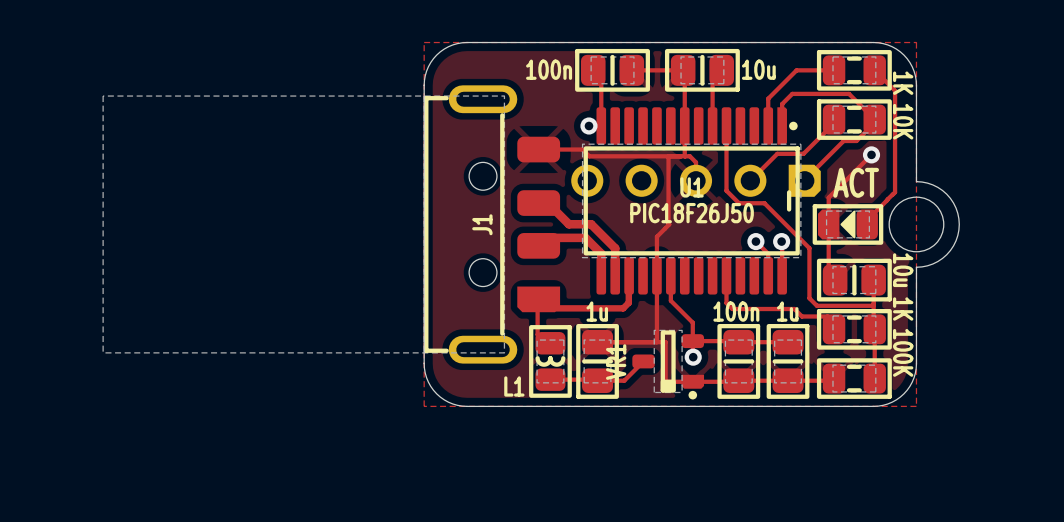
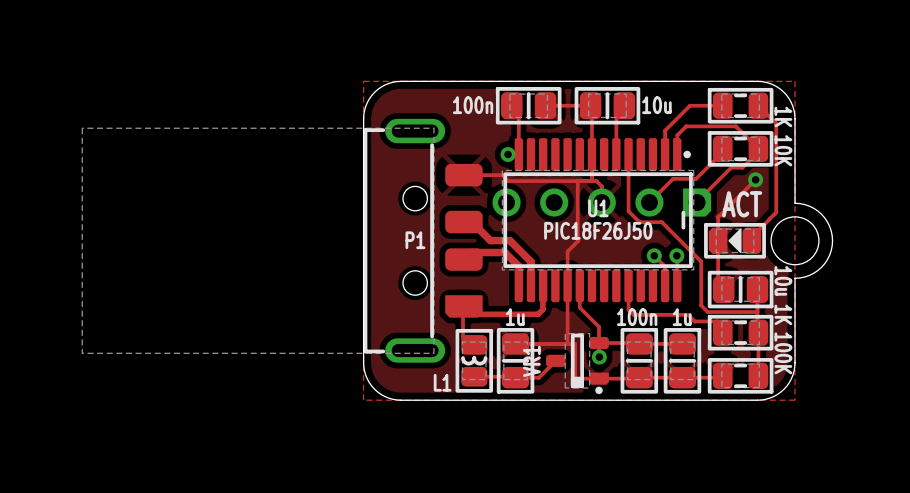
J1 name: J1 (482, 224) -> P1 (415, 240)

